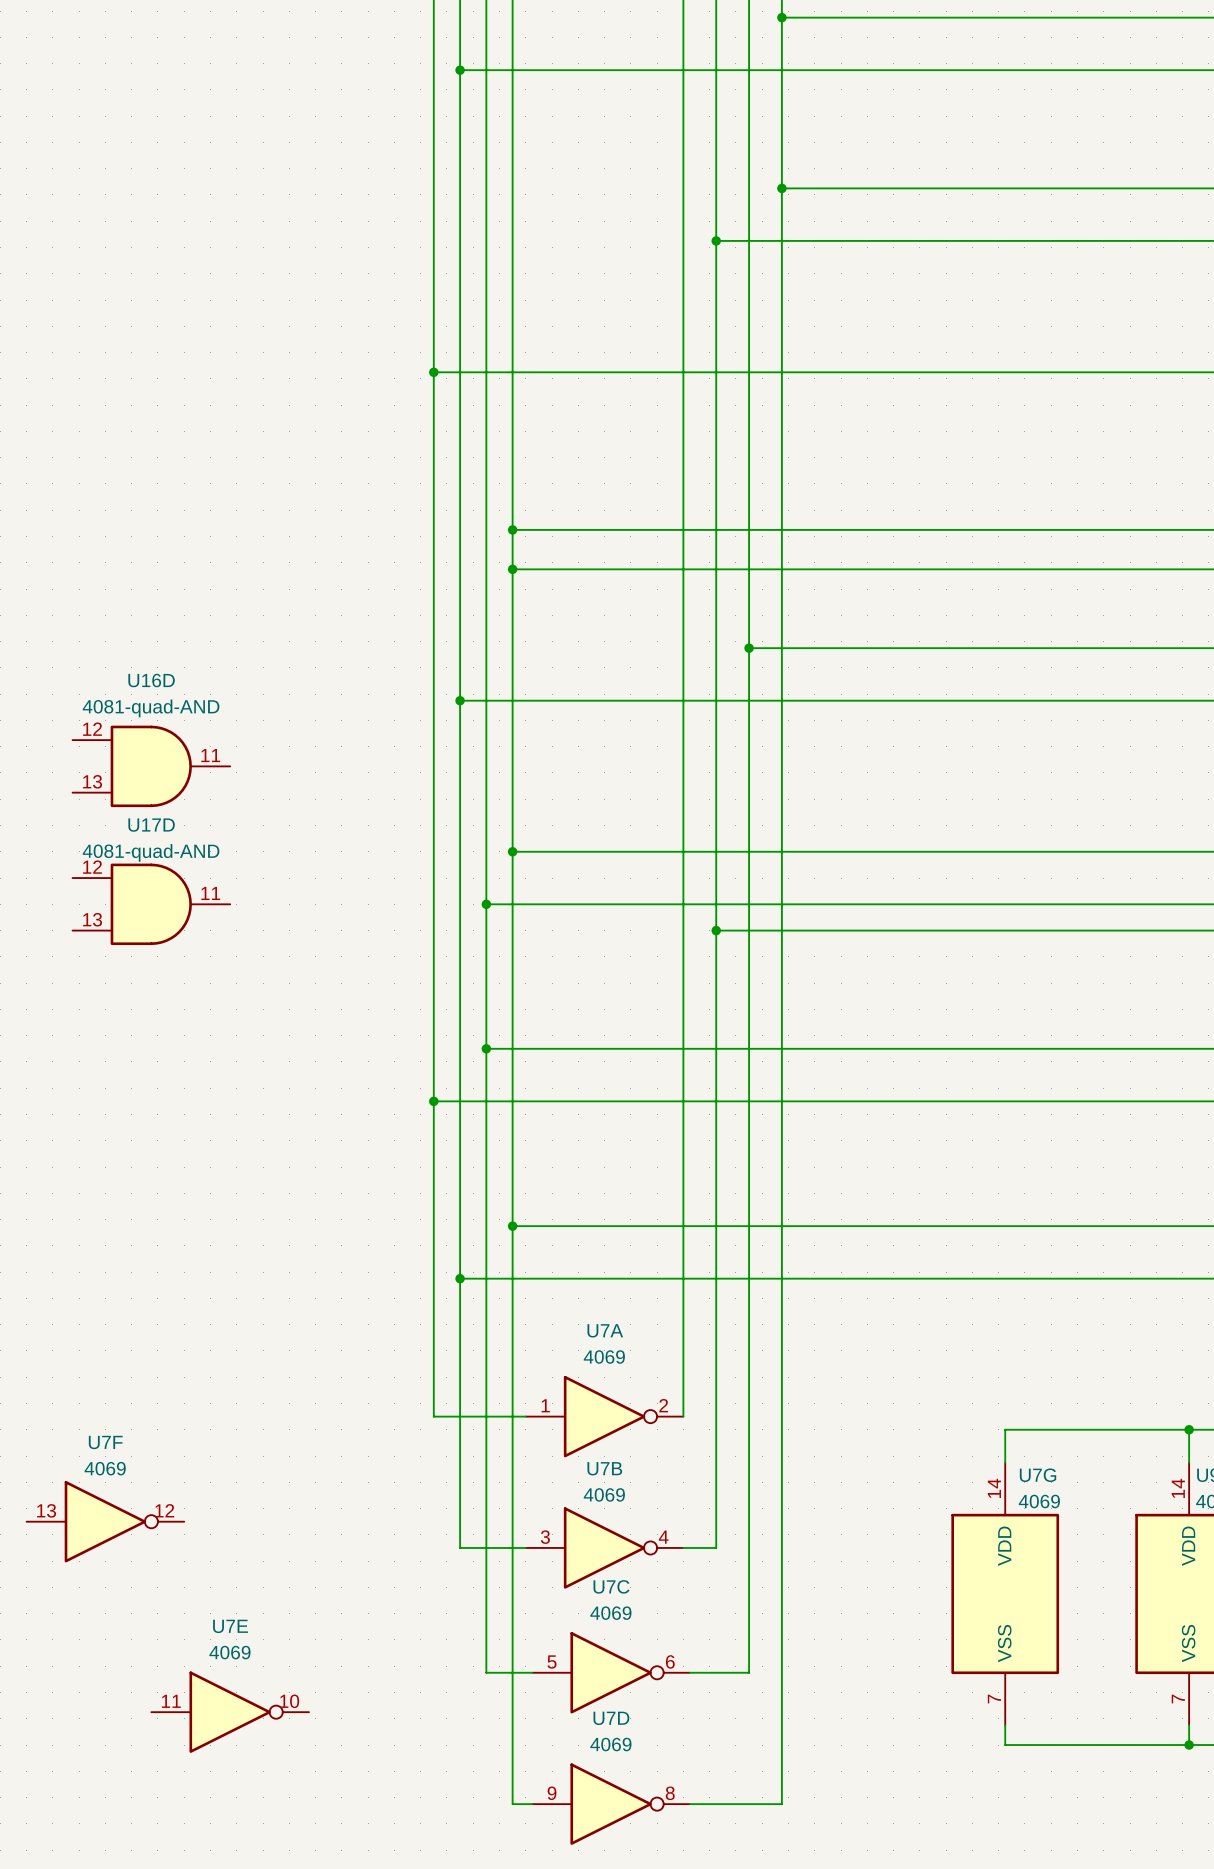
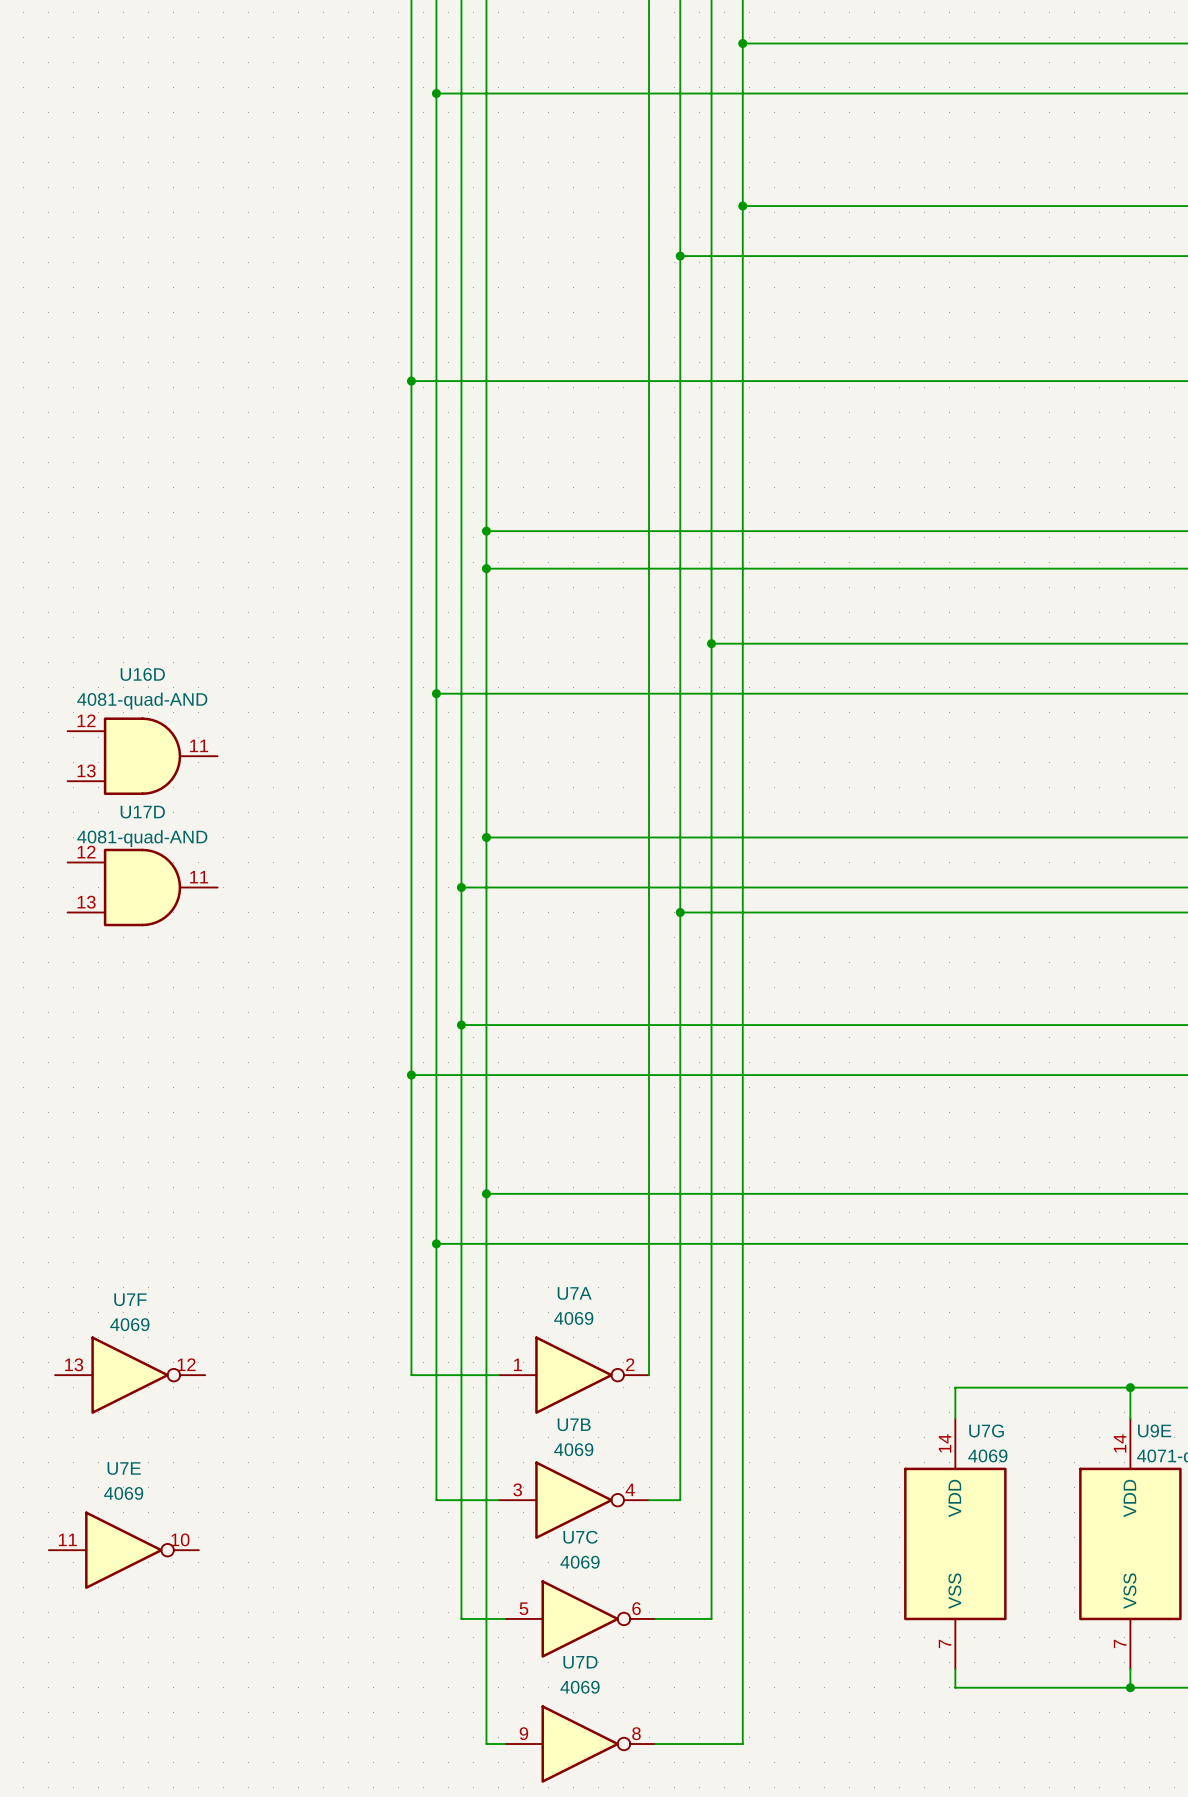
U7F position: (105, 1521) -> (130, 1375)
U7E position: (230, 1712) -> (123, 1550)

